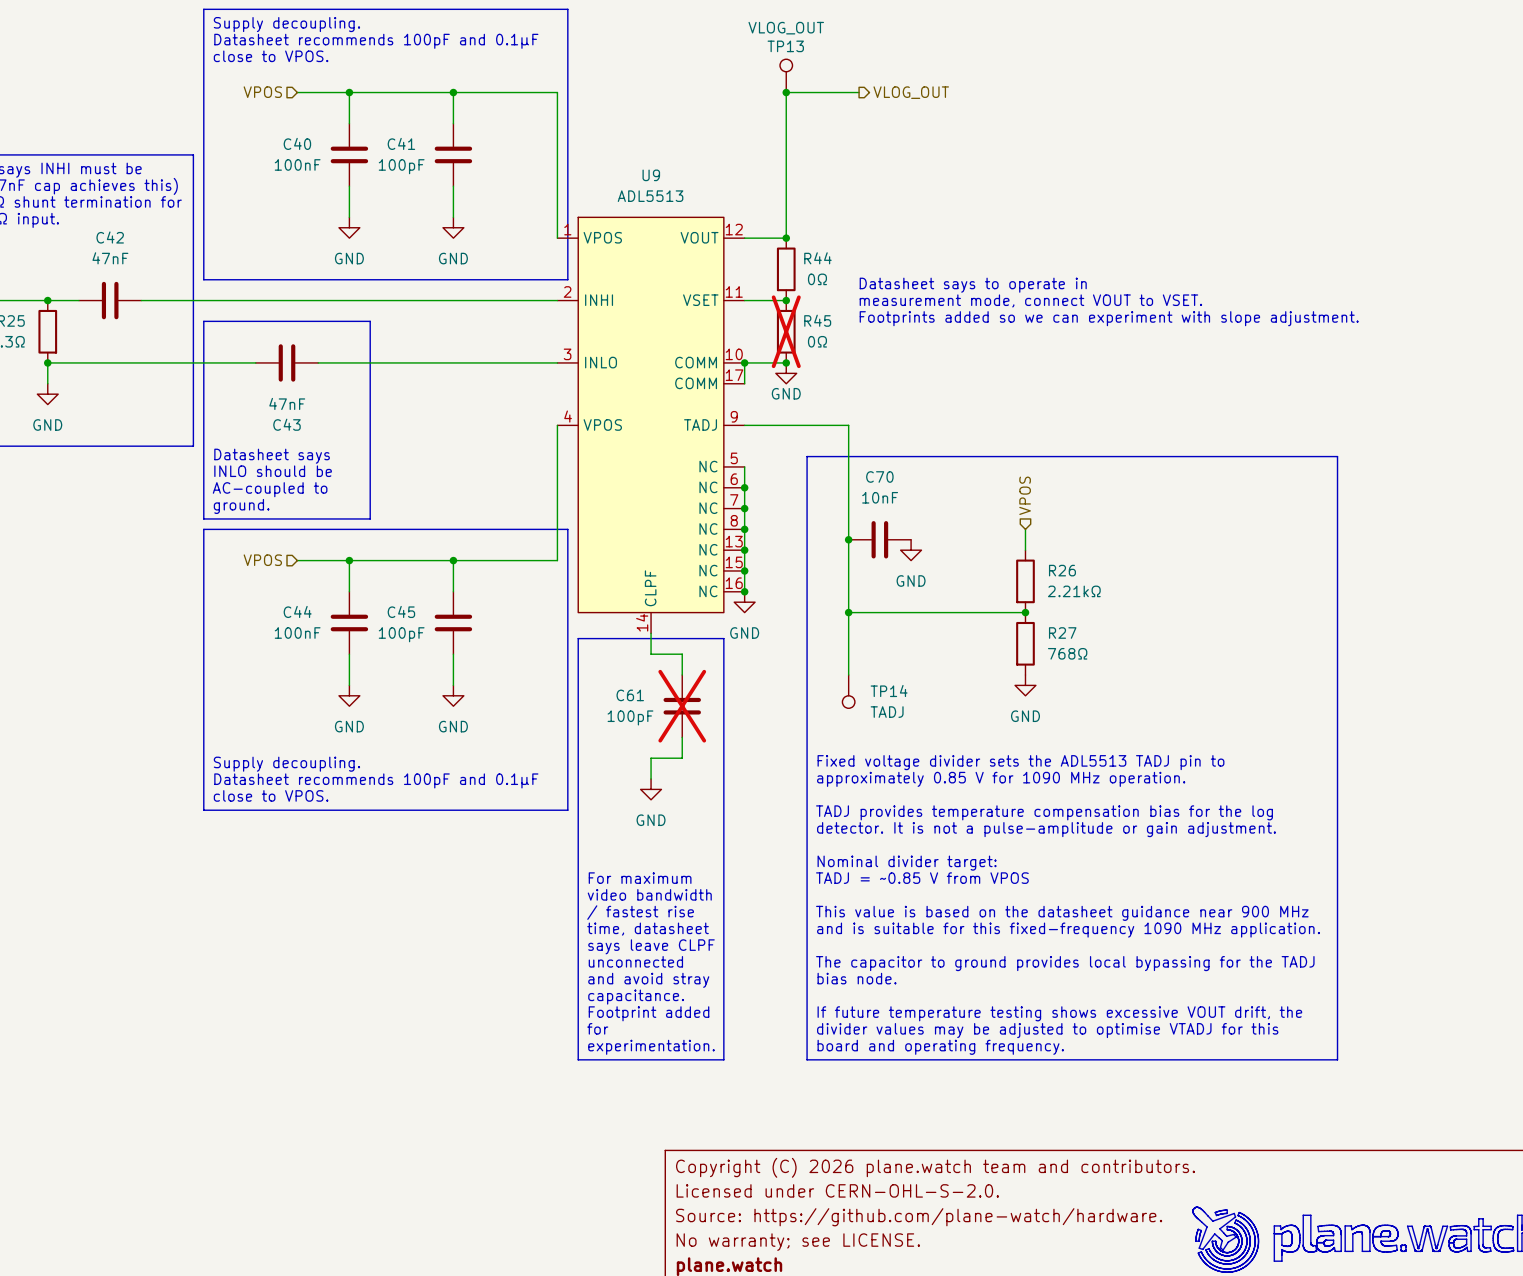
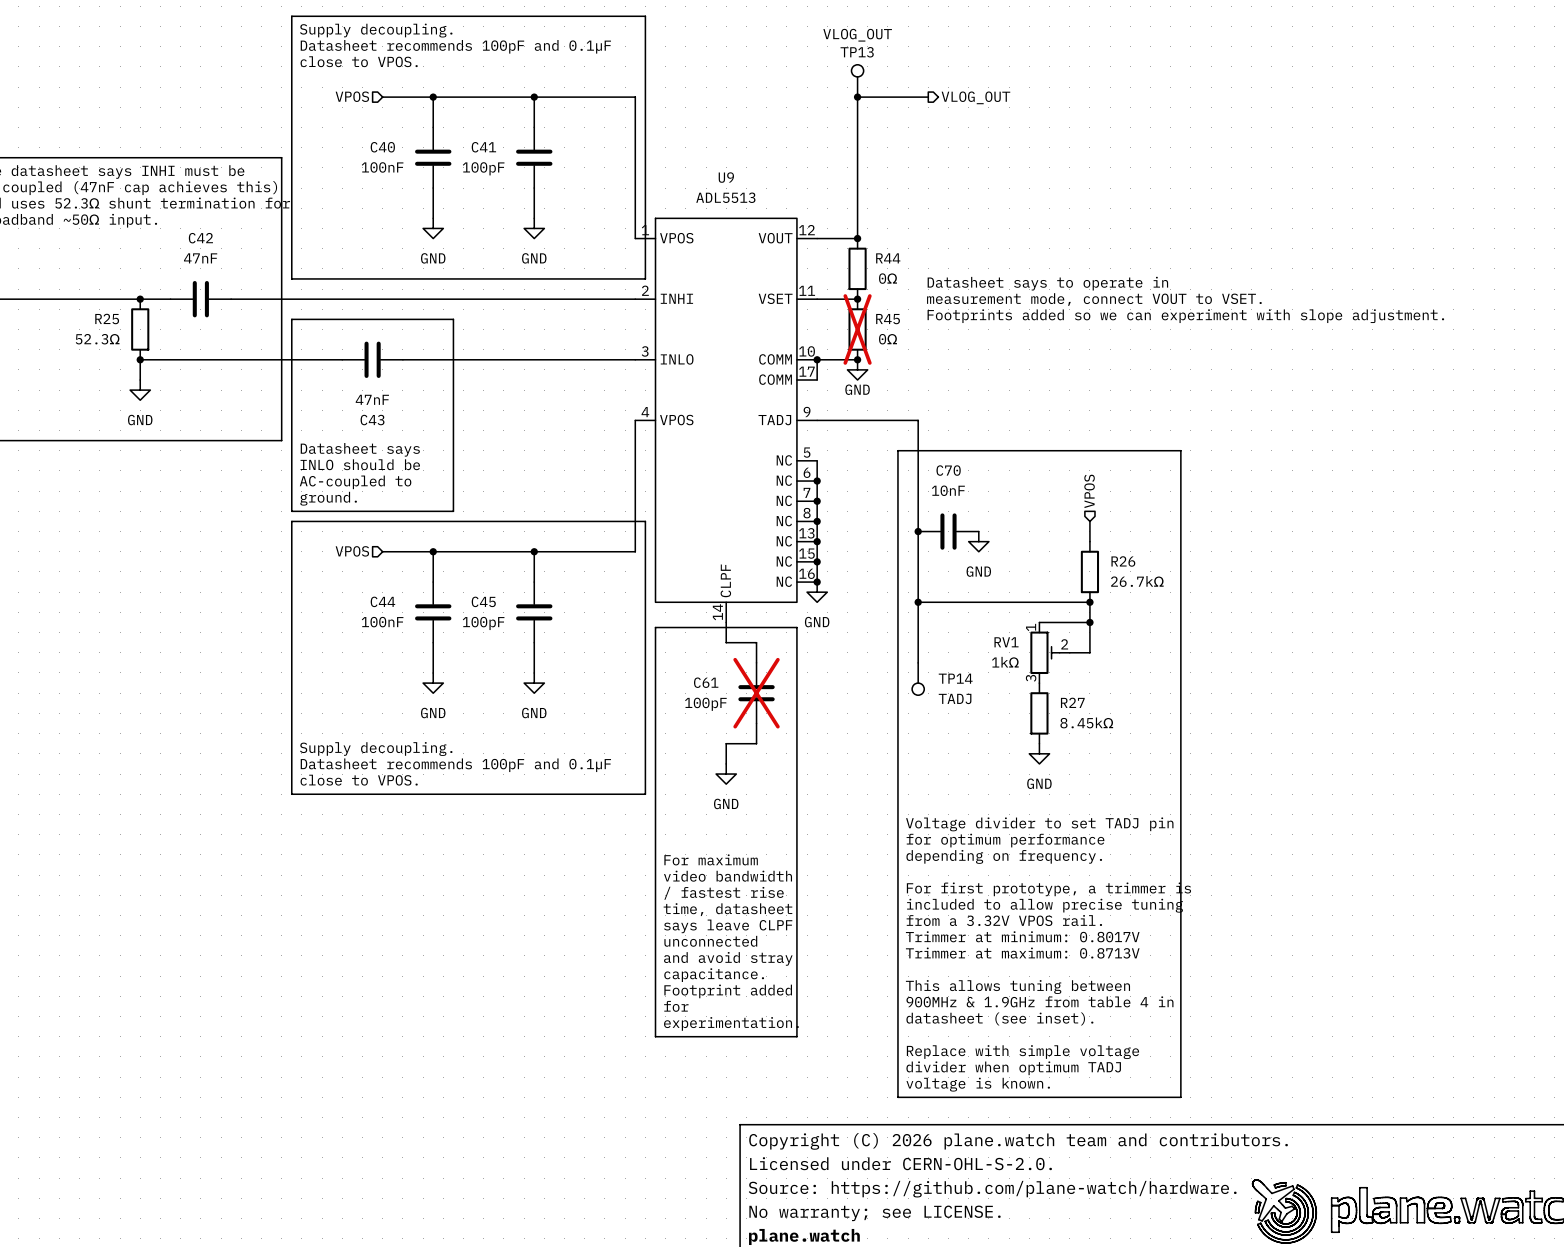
line: (827, 456) (807, 456) (807, 1059) (1337, 1059) (1337, 456) (1119, 456) -> (897, 450) (897, 1097) (1180, 1097) (1180, 450)
R26 value: 2.21kΩ (1074, 591) -> 26.7kΩ (1137, 581)
wire: none -> (1089, 602) (1089, 652) (1069, 652)
wire: none -> (1039, 622) (1089, 622)
junction: none -> (1089, 622)
R27 position: (1025, 643) -> (1039, 713)
R27 value: 768Ω (1067, 653) -> 8.45kΩ (1086, 722)
RV1: none -> 1kΩ (1050, 652)
power symbol position: GND (1025, 685) -> GND (1039, 753)
text: Fixed voltage divider sets the ADL5513 TADJ pin to (1020, 762) -> none
text: approximately 0.85 V for 1090 MHz operation. (1001, 779) -> none
text: TADJ provides temperature compensation bias for the log (1044, 812) -> none
text: detector. It is not a pulse-amplitude or gain adjustment. (1046, 829) -> none
text: none -> Voltage divider to set TADJ pin (1039, 824)
text: none -> for optimum performance (1005, 840)
text: Nominal divider target: (907, 863) -> none
text: none -> depending on frequency. (1004, 856)
text: TADJ = ~0.85 V from VPOS (922, 878) -> none
text: none -> For first prototype, a trimmer is (1048, 889)
text: This value is based on the datasheet guidance near 900 MHz (1062, 913) -> none
text: none -> included to allow precise tuning (1045, 905)
text: and is suitable for this fixed-frequency 1090 MHz application. (1068, 930) -> none
text: none -> from a 3.32V VPOS rail. (1004, 920)
text: none -> Trimmer at minimum: 0.8017V (1022, 936)
text: The capacitor to ground provides local bypassing for the TADJ (1065, 963) -> none
text: none -> Trimmer at maximum: 0.8713V (1022, 953)
text: bias node. (857, 978) -> none
text: none -> This allows tuning between (1017, 987)
text: If future temperature testing shows excessive VOUT drift, the (1059, 1013) -> none
text: none -> 900MHz & 1.9GHz from table 4 in (1039, 1001)
text: divider values may be adjusted to optimise VTADJ for this (1047, 1030) -> none
text: none -> datasheet (see inset). (999, 1018)
text: board and operating frequency. (940, 1047) -> none
text: none -> Replace with simple voltage (1022, 1052)
text: none -> divider when optimum TADJ (1013, 1068)
text: none -> voltage is known. (978, 1084)

